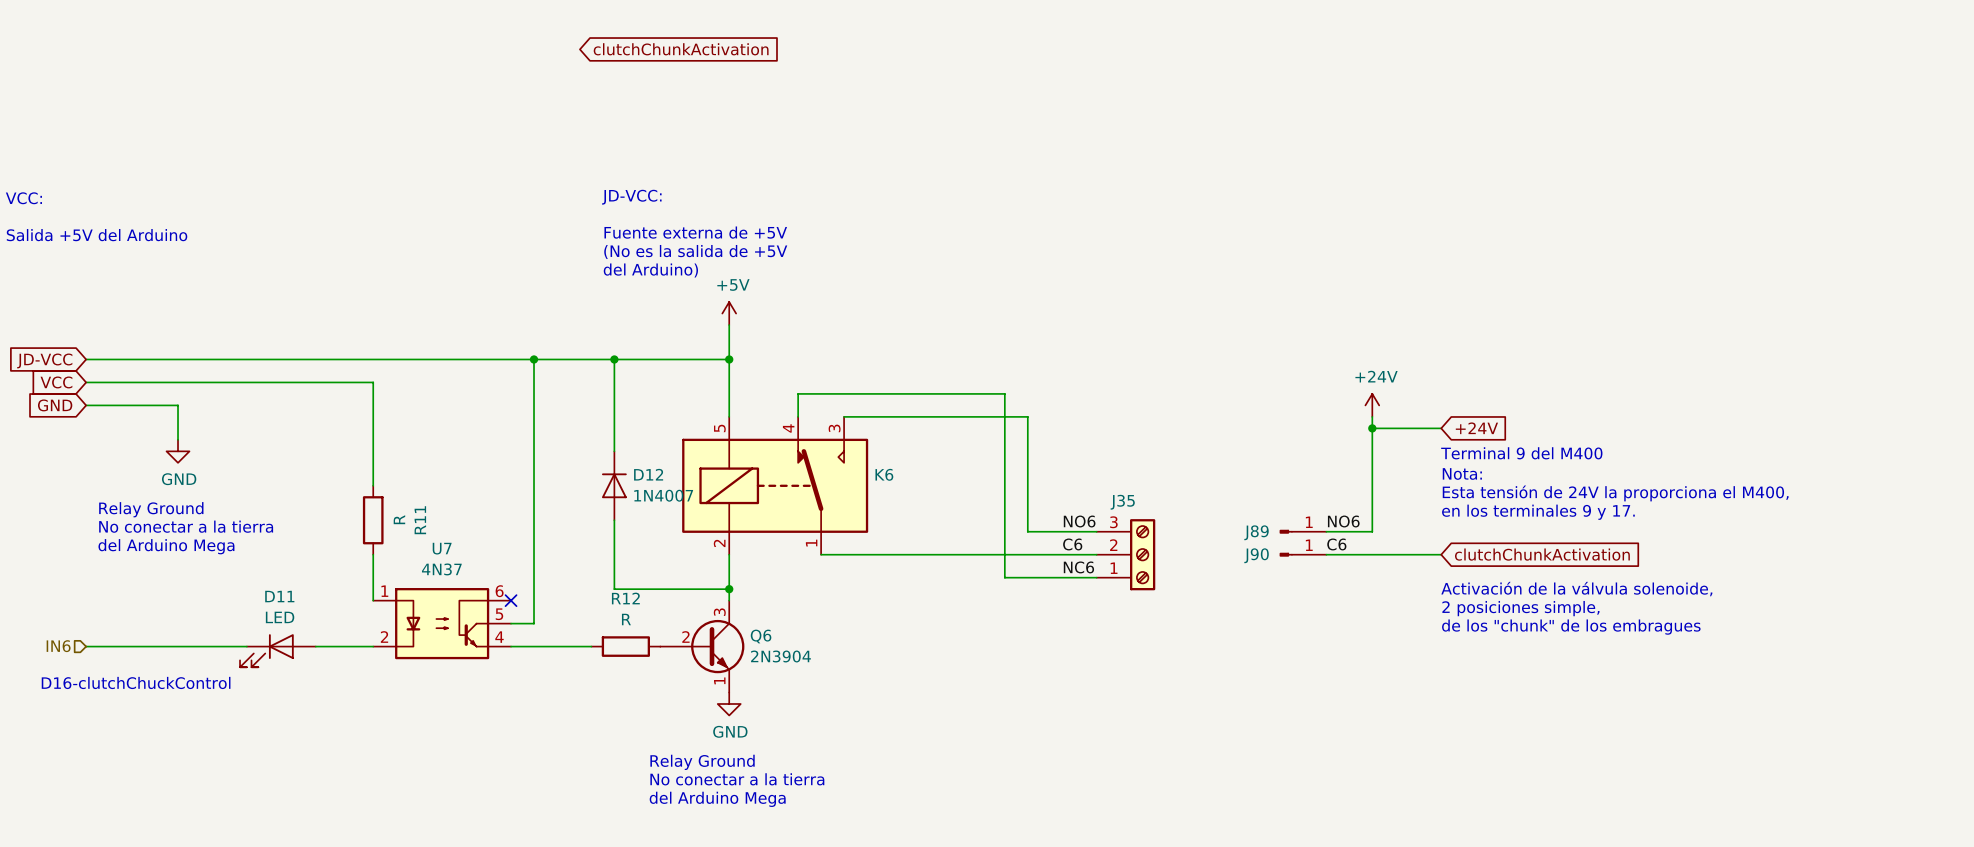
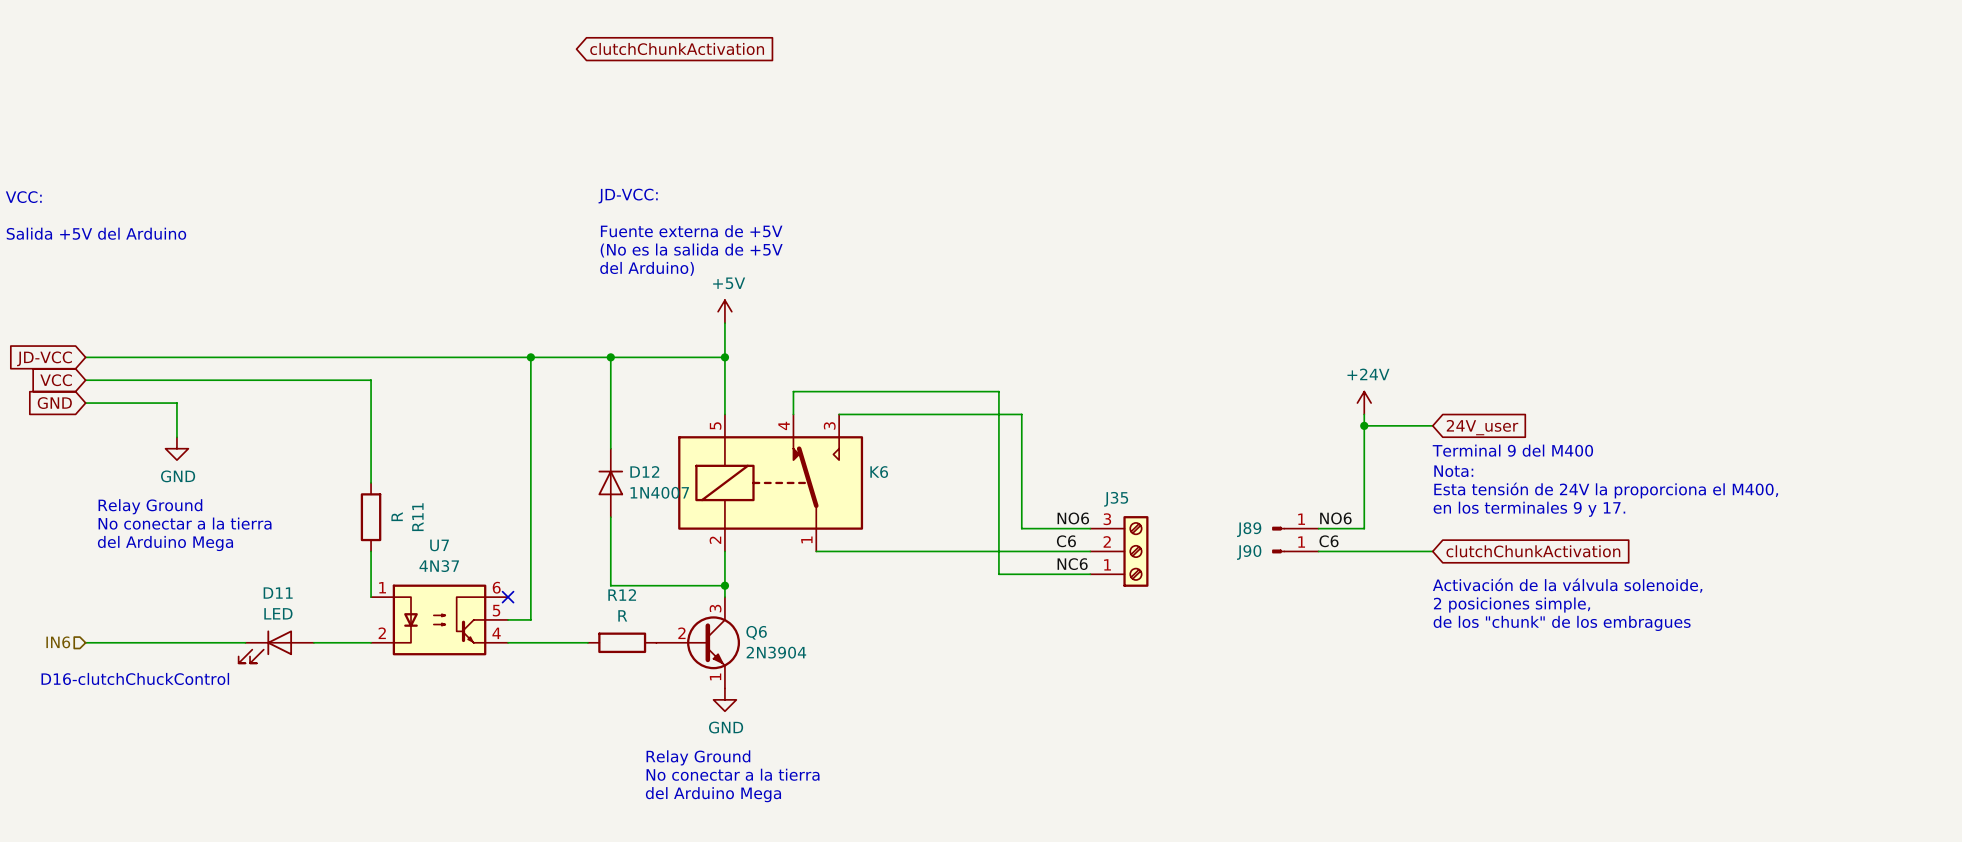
global label: +24V (1476, 428) -> 24V_user (1482, 427)

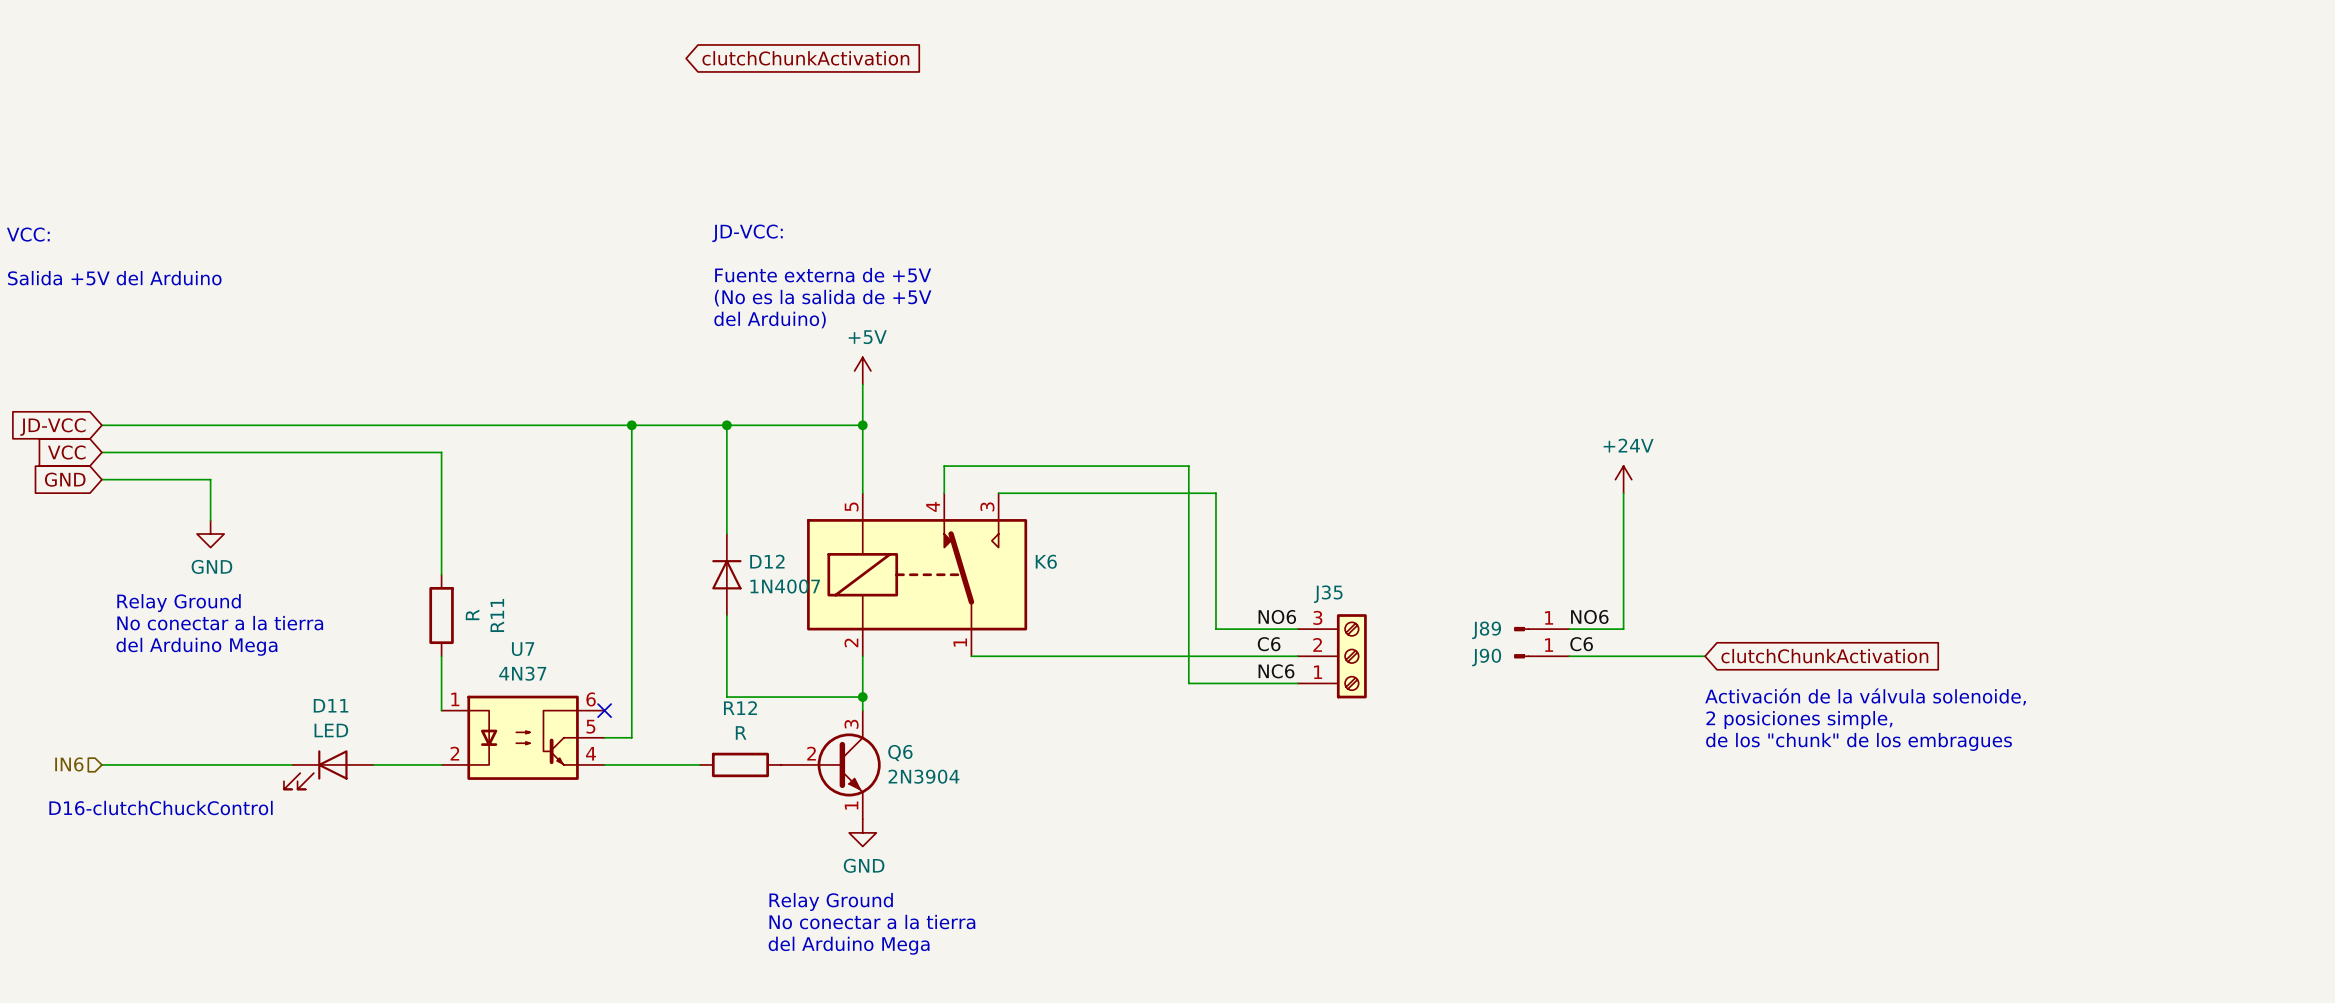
wire: (1364, 425) (1432, 425) -> none
junction: (1364, 425) -> none
global label: 24V_user (1482, 427) -> none
text: Terminal 9 del M400 (1512, 450) -> none
text: Nota: (1453, 471) -> none
text: Esta tensión de 24V la proporciona el M400, (1606, 490) -> none
text: en los terminales 9 y 17. (1529, 509) -> none

